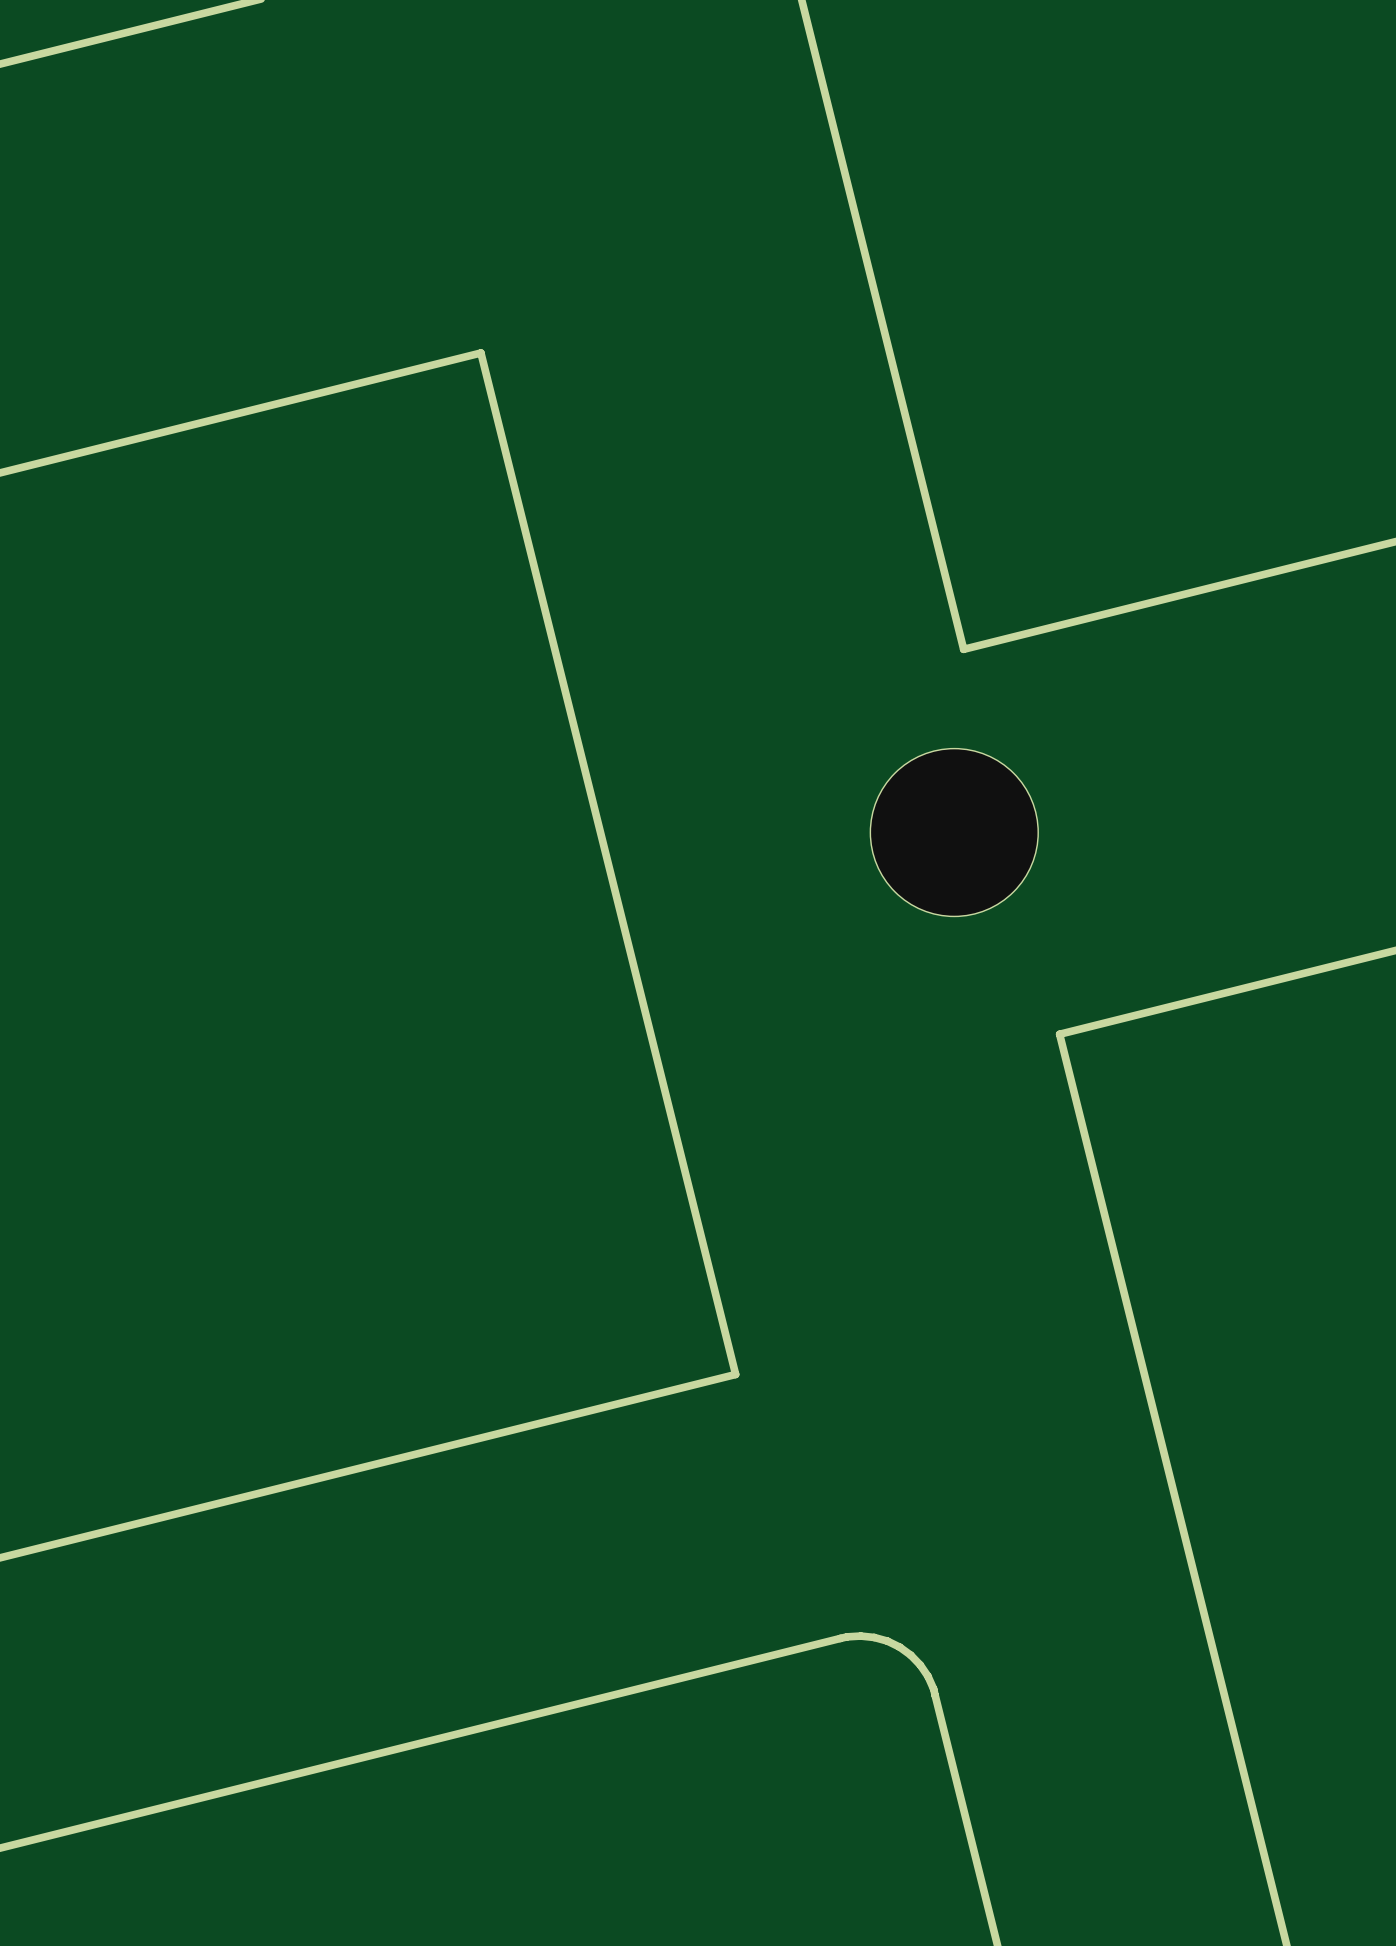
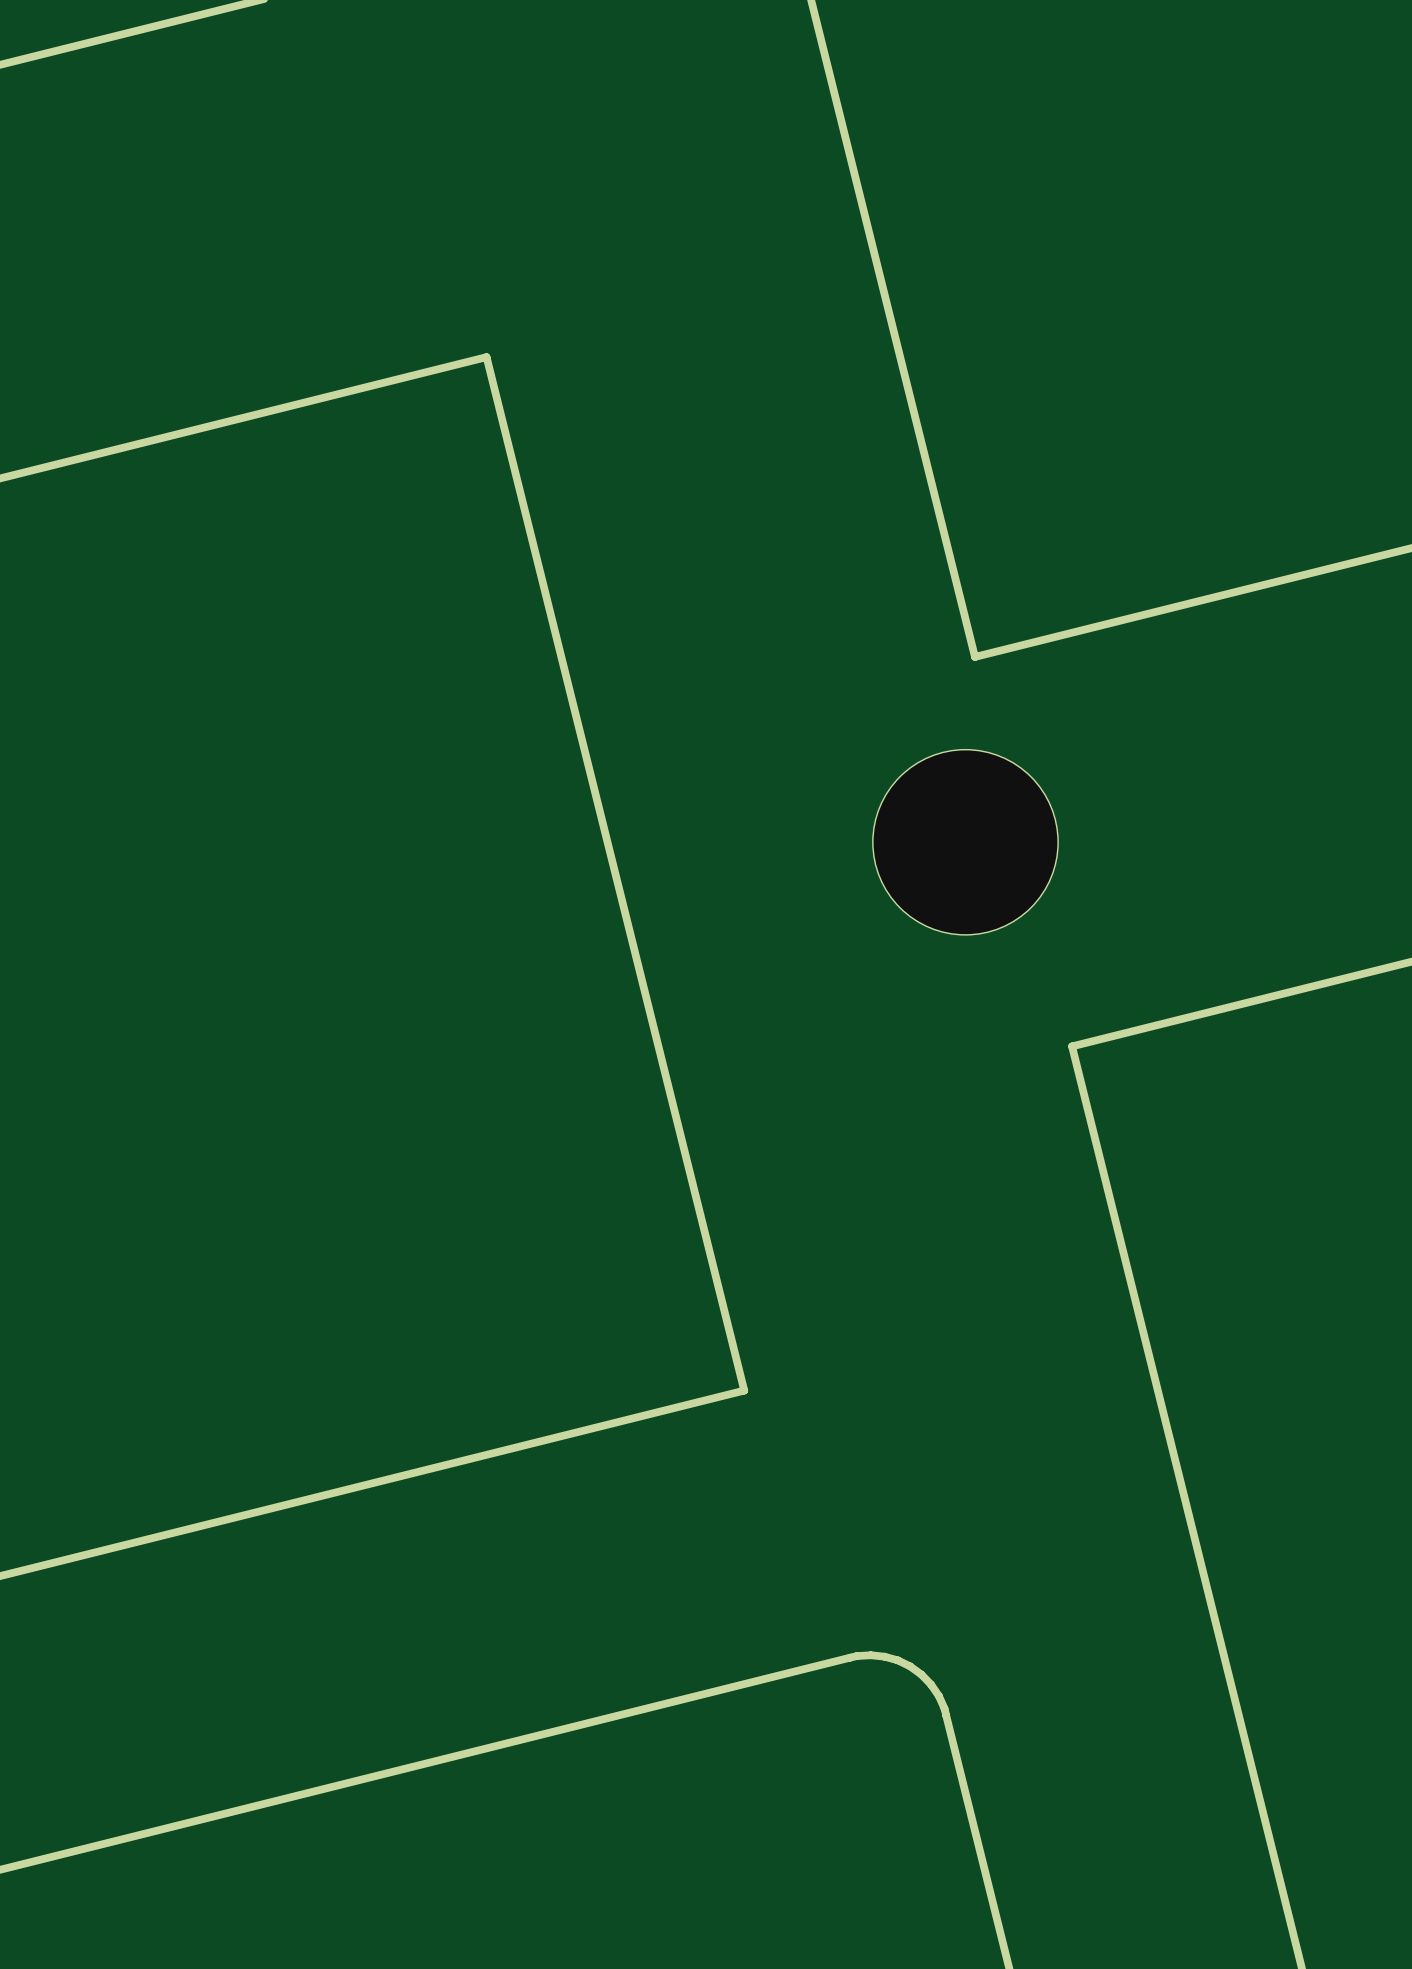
part footprint: [870, 748, 1039, 917] -> [872, 749, 1059, 935]

